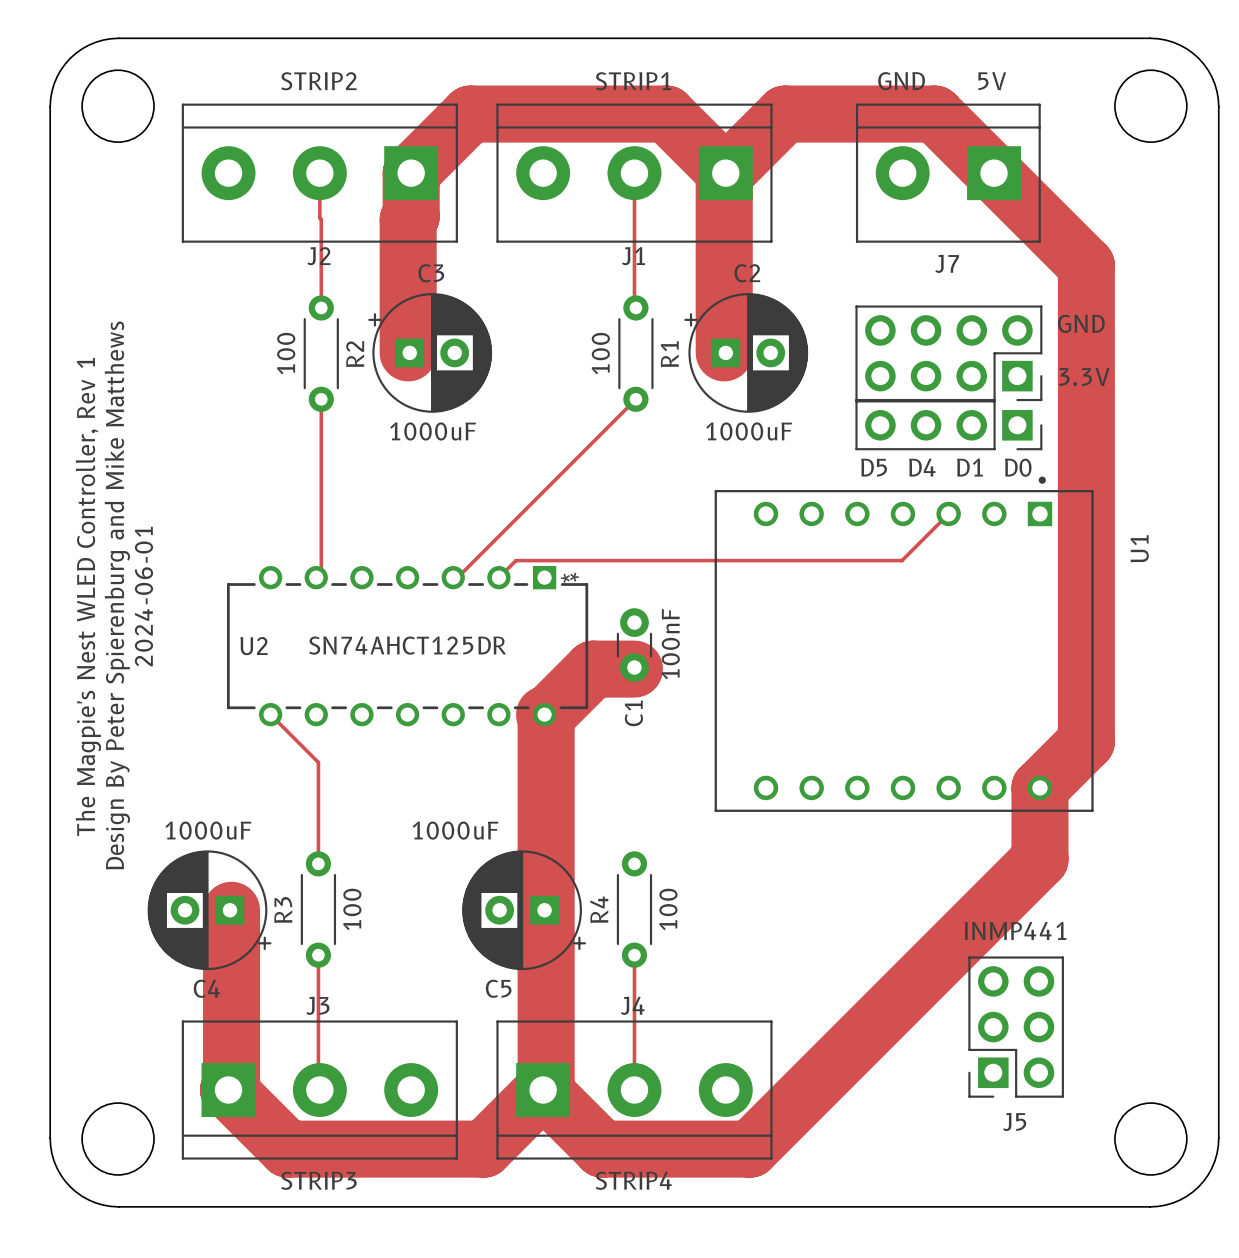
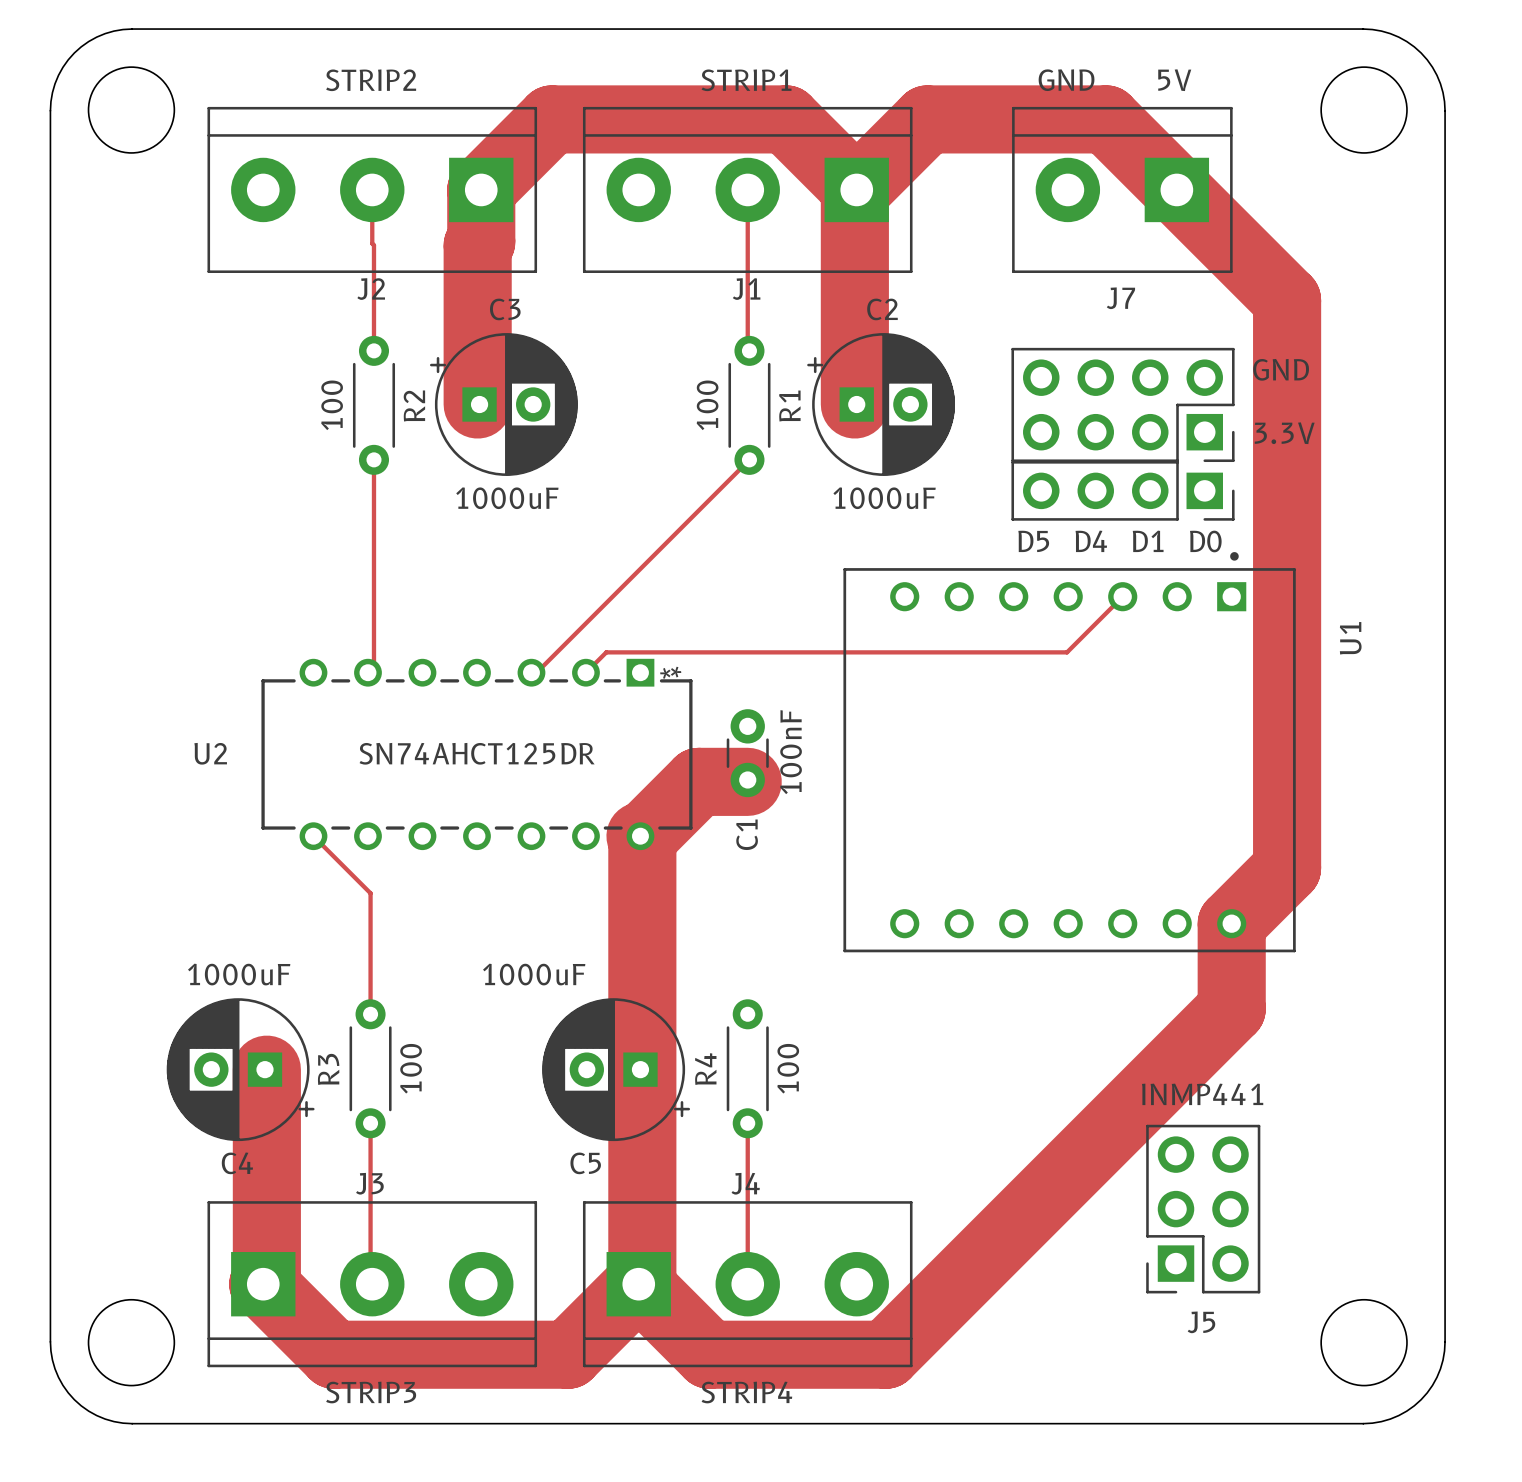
text: Design By Peter Spierenburg and Mike Matthews (117, 595) -> none
text: The Magpie's Nest WLED Controller, Rev 1 (88, 596) -> none
text: 2024-06-01 (143, 596) -> none
U2 name position: U2 (254, 646) -> U2 (210, 753)

